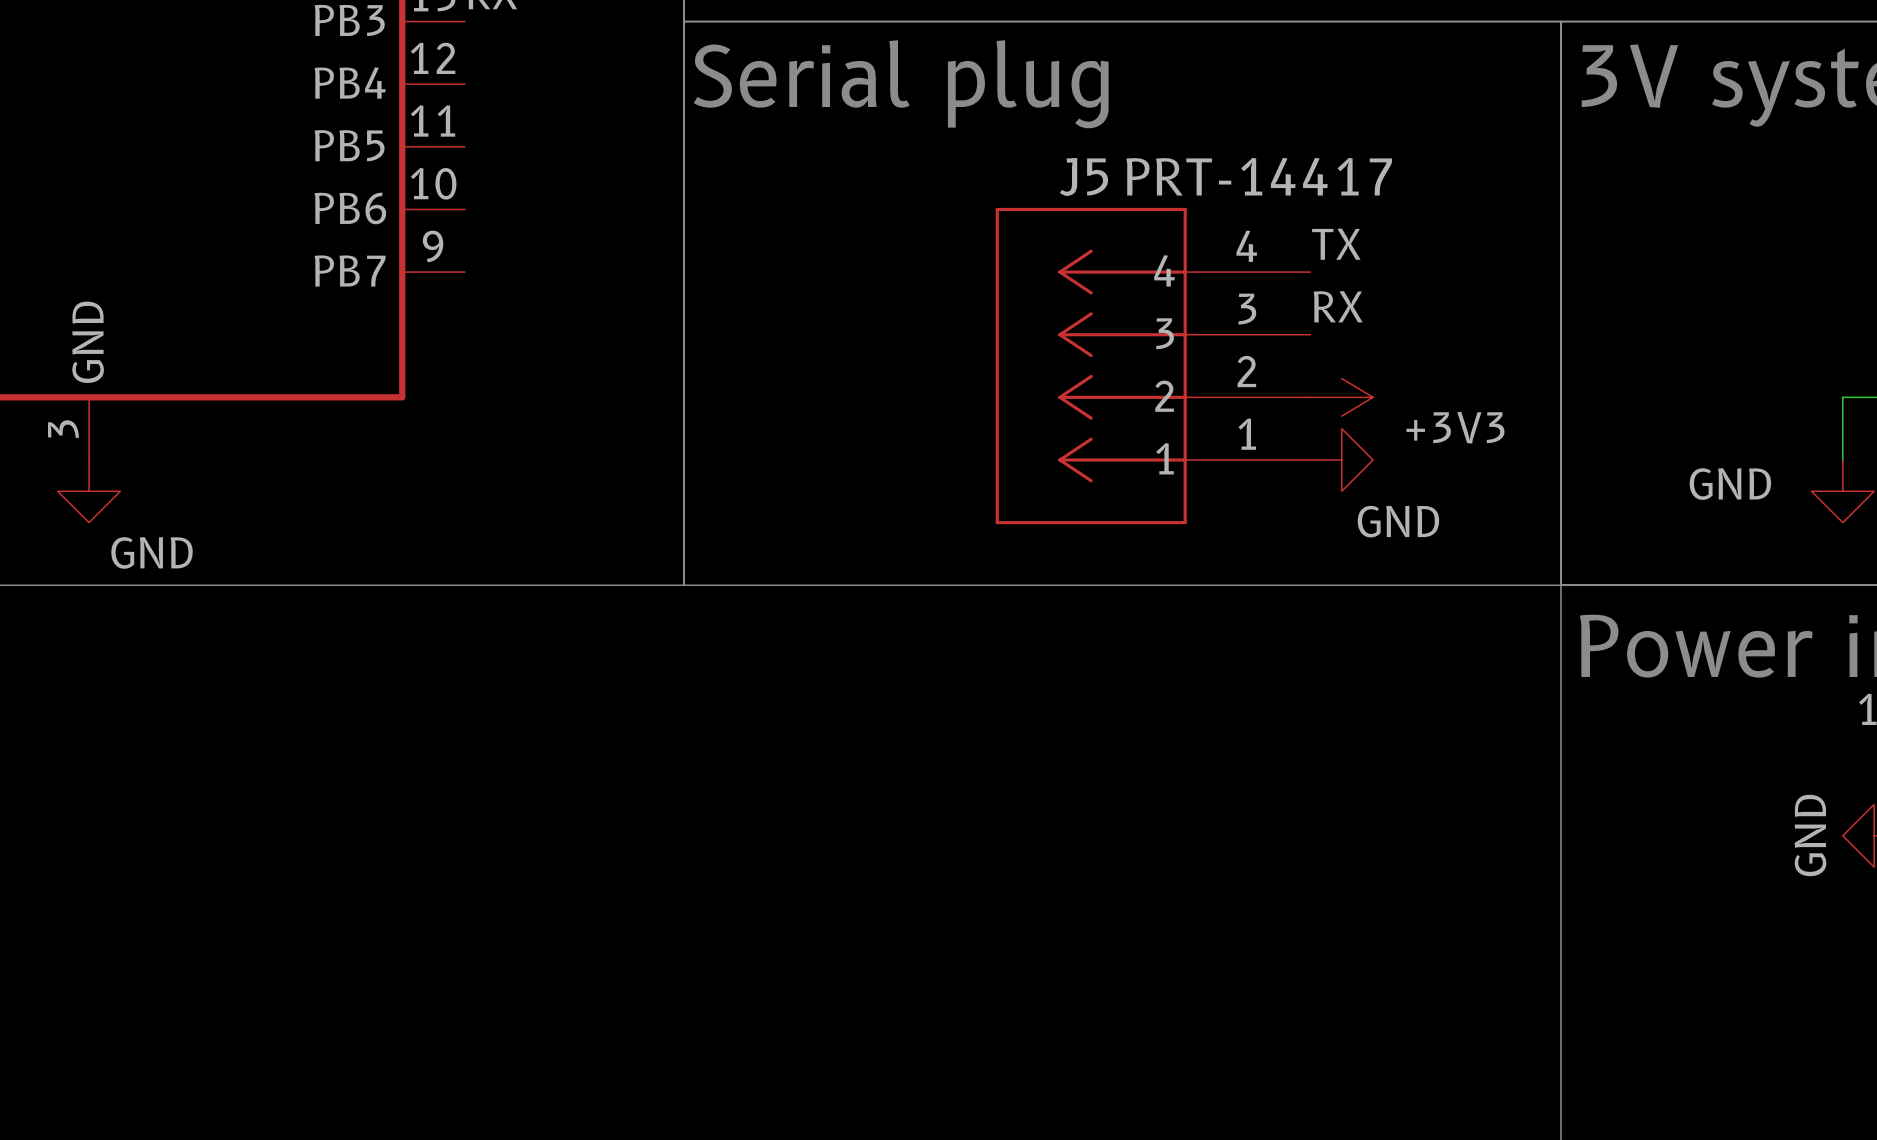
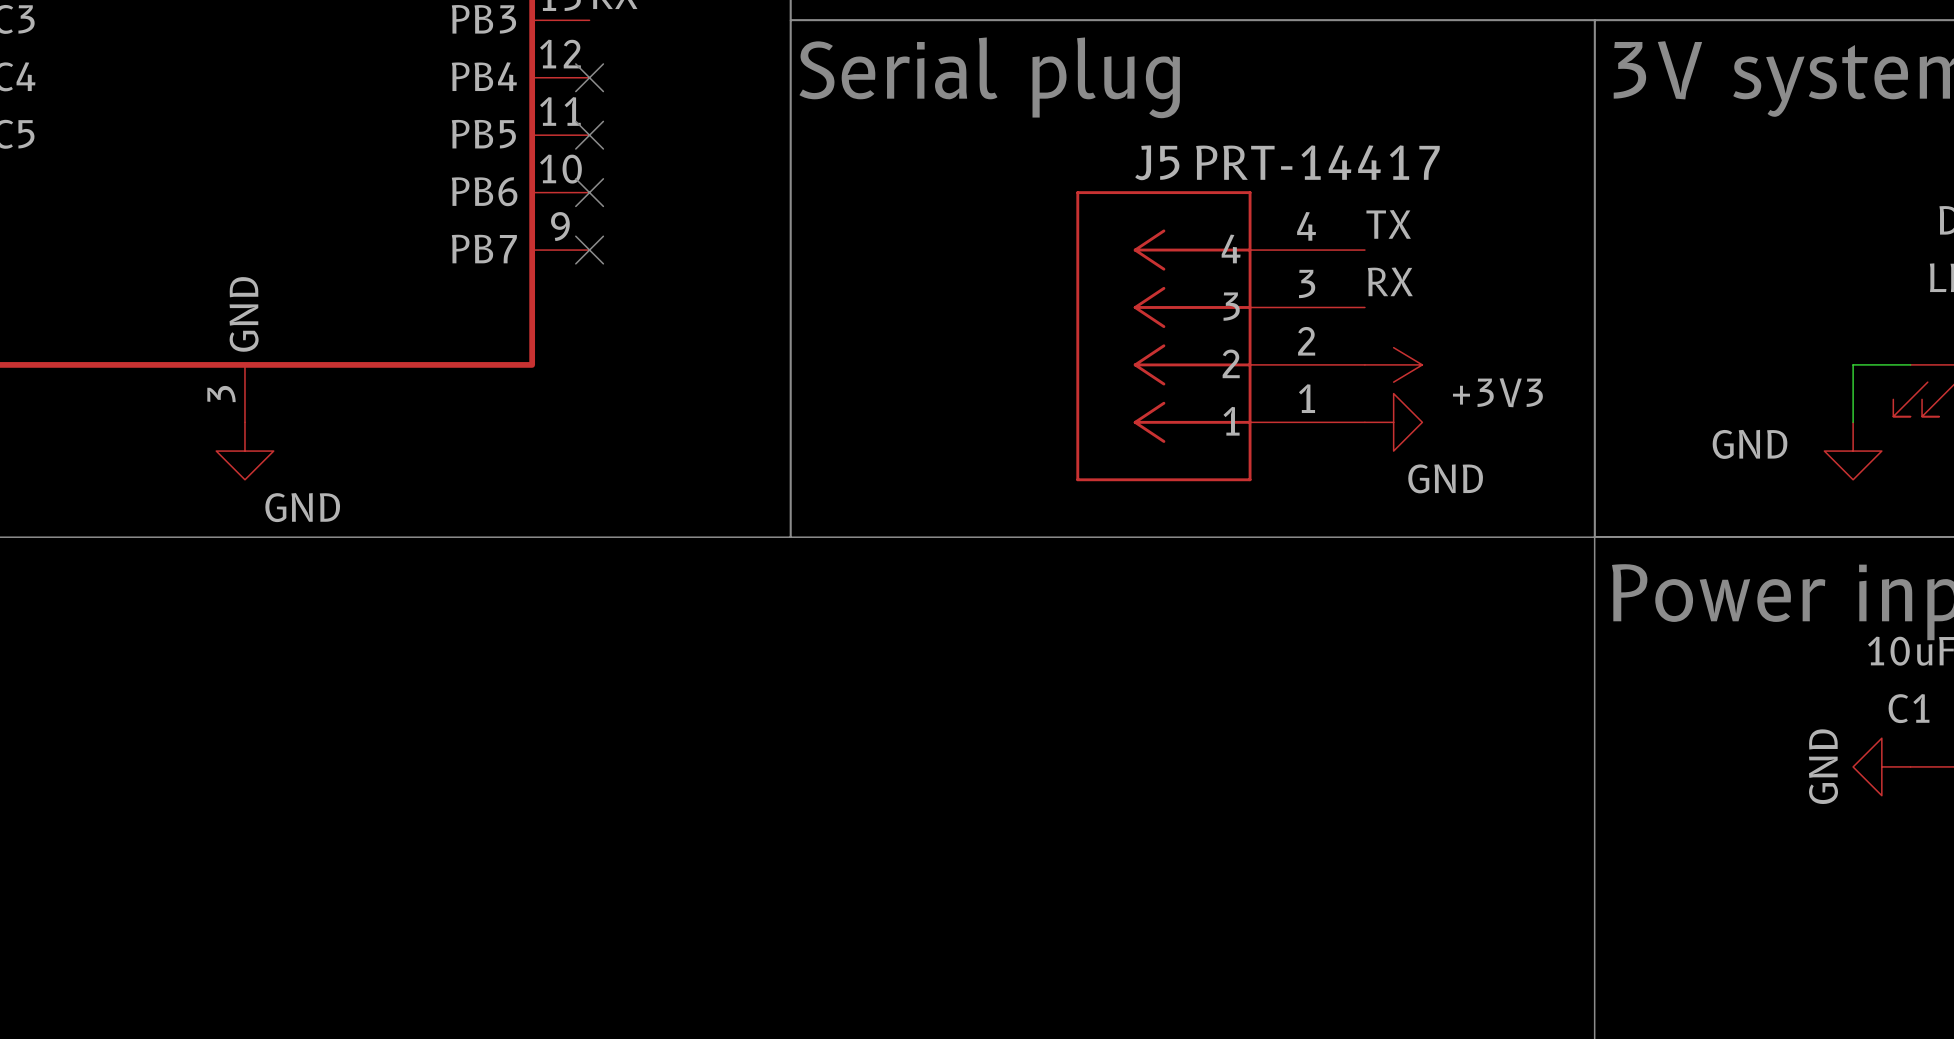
no-connect mark: none -> (589, 77)
no-connect mark: none -> (589, 135)
no-connect mark: none -> (589, 192)
no-connect mark: none -> (589, 250)

